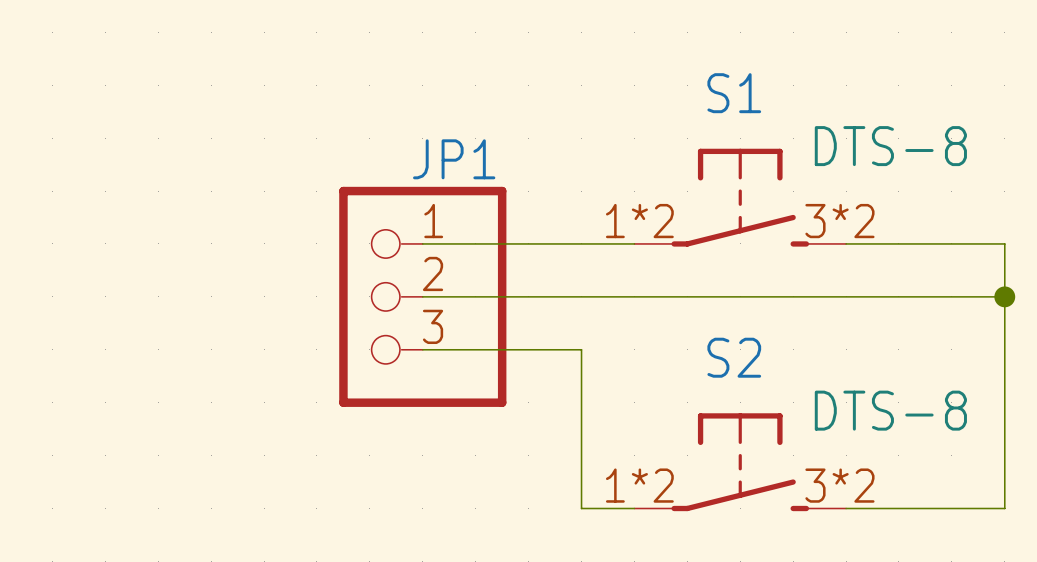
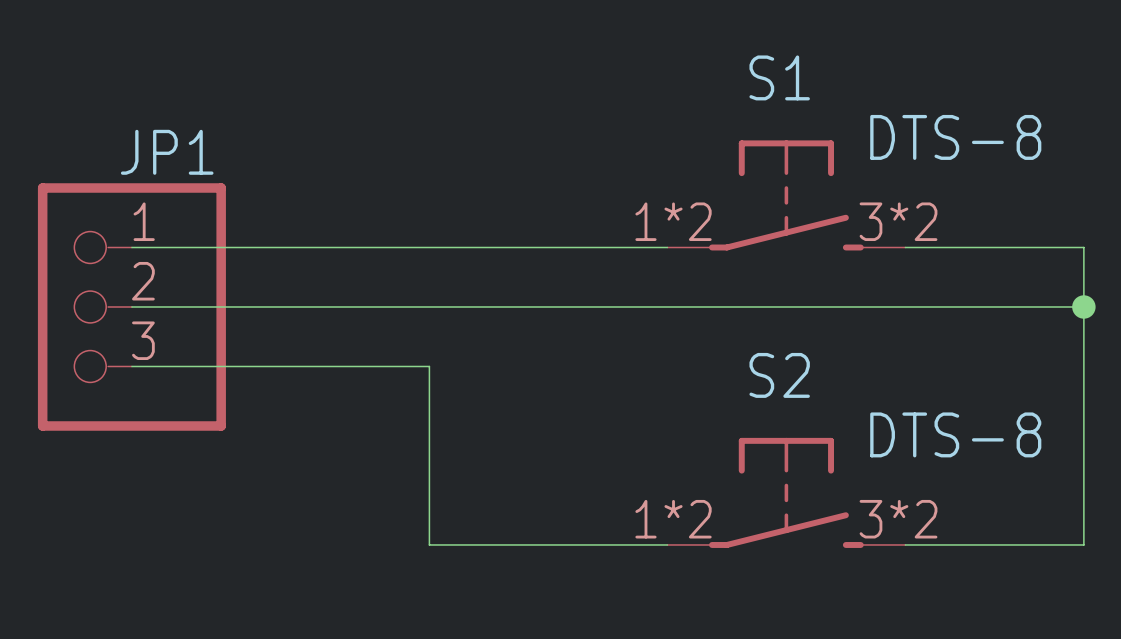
wire: none -> (131, 247) (429, 247)
wire: none -> (131, 306) (429, 306)
JP1 position: (422, 296) -> (131, 306)
wire: (422, 349) (581, 349) (581, 508) -> (131, 366) (429, 366) (429, 544) (607, 544)

